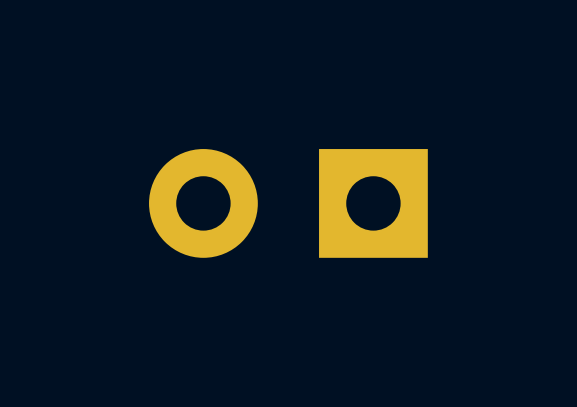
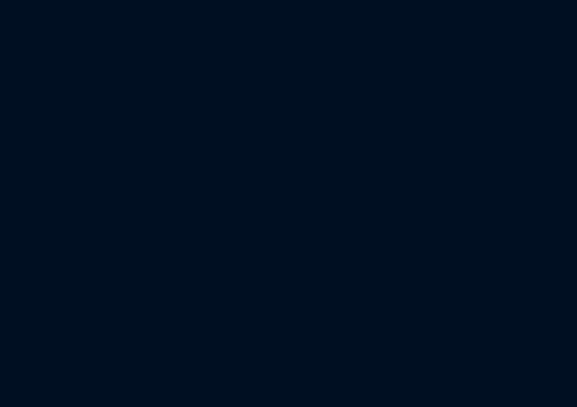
part: (288, 203) -> none

